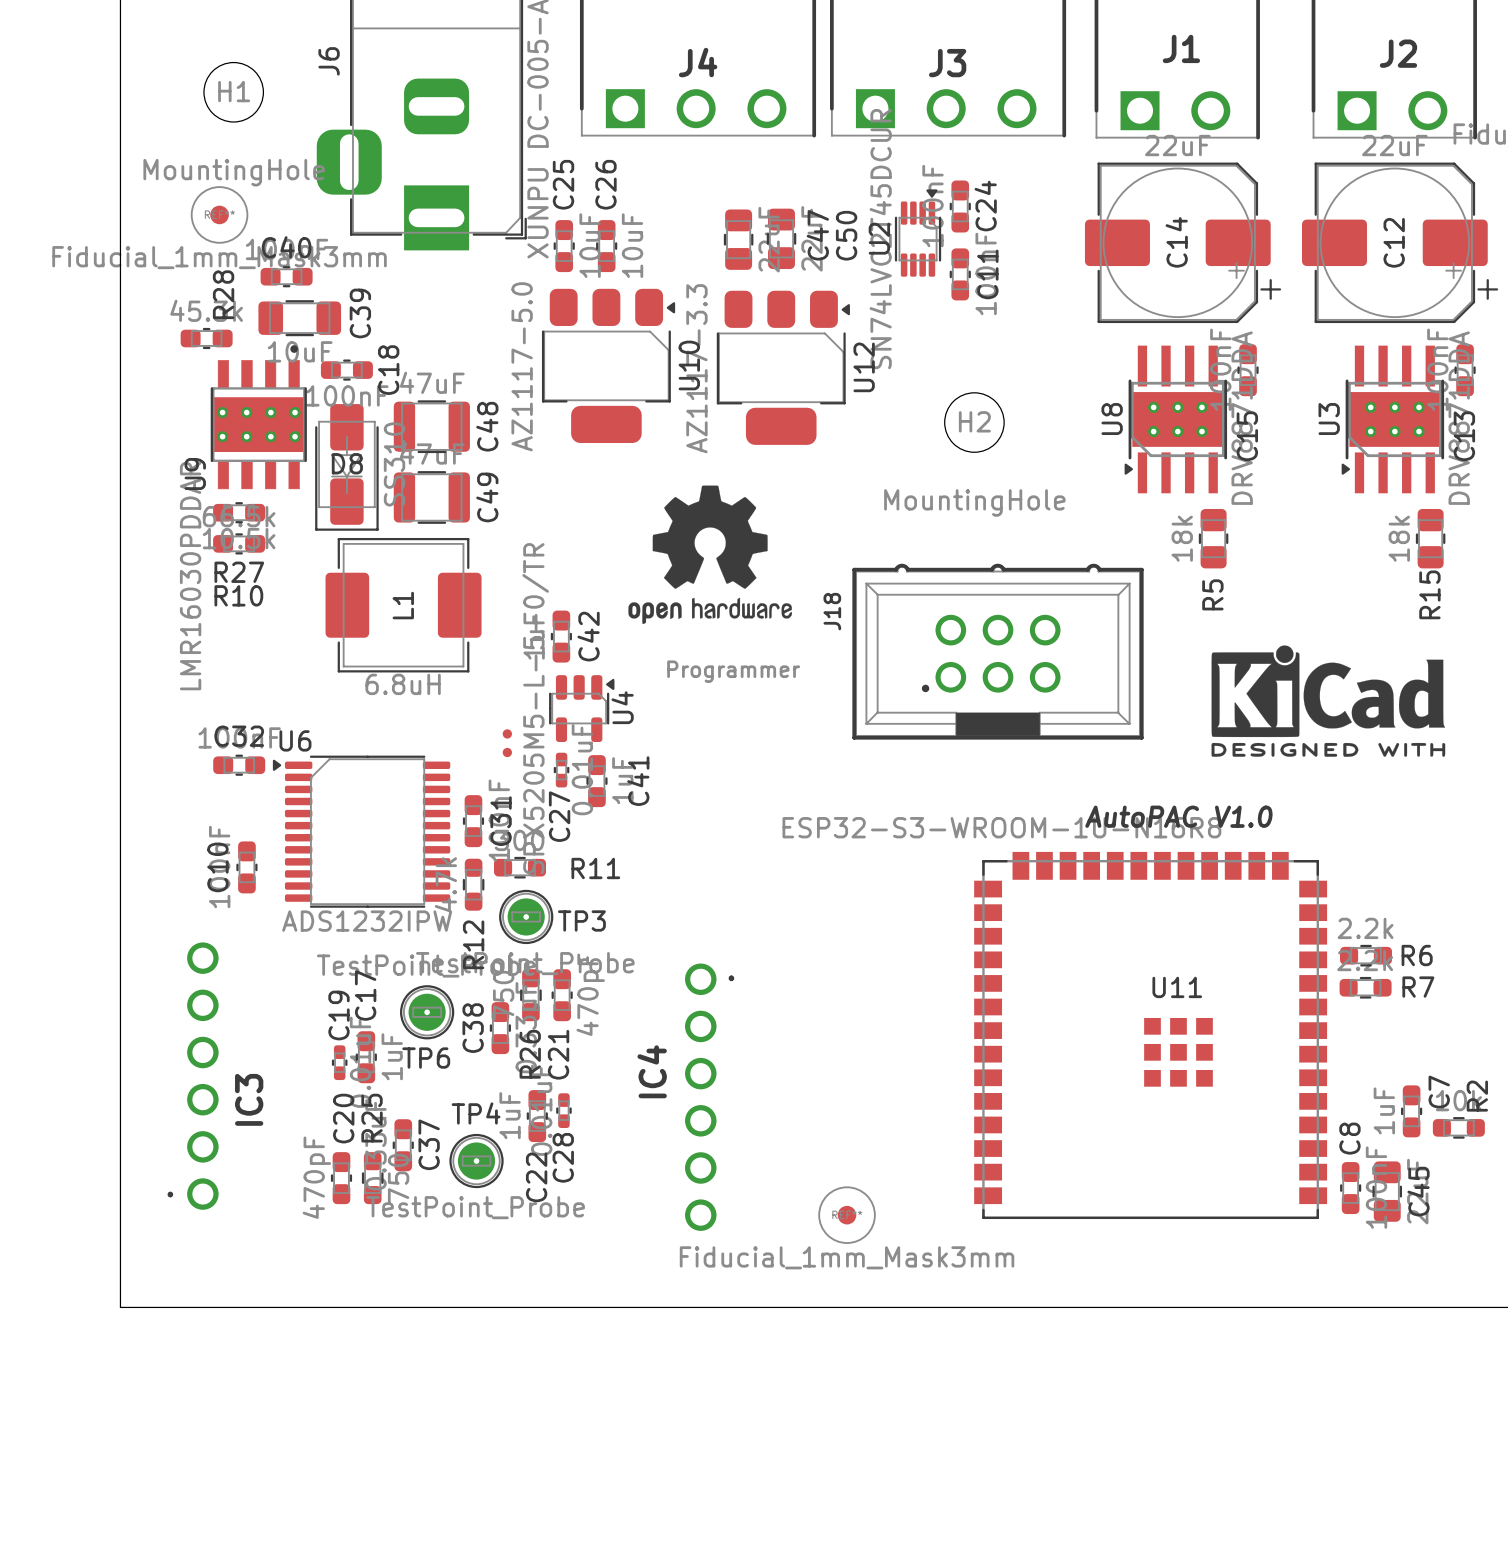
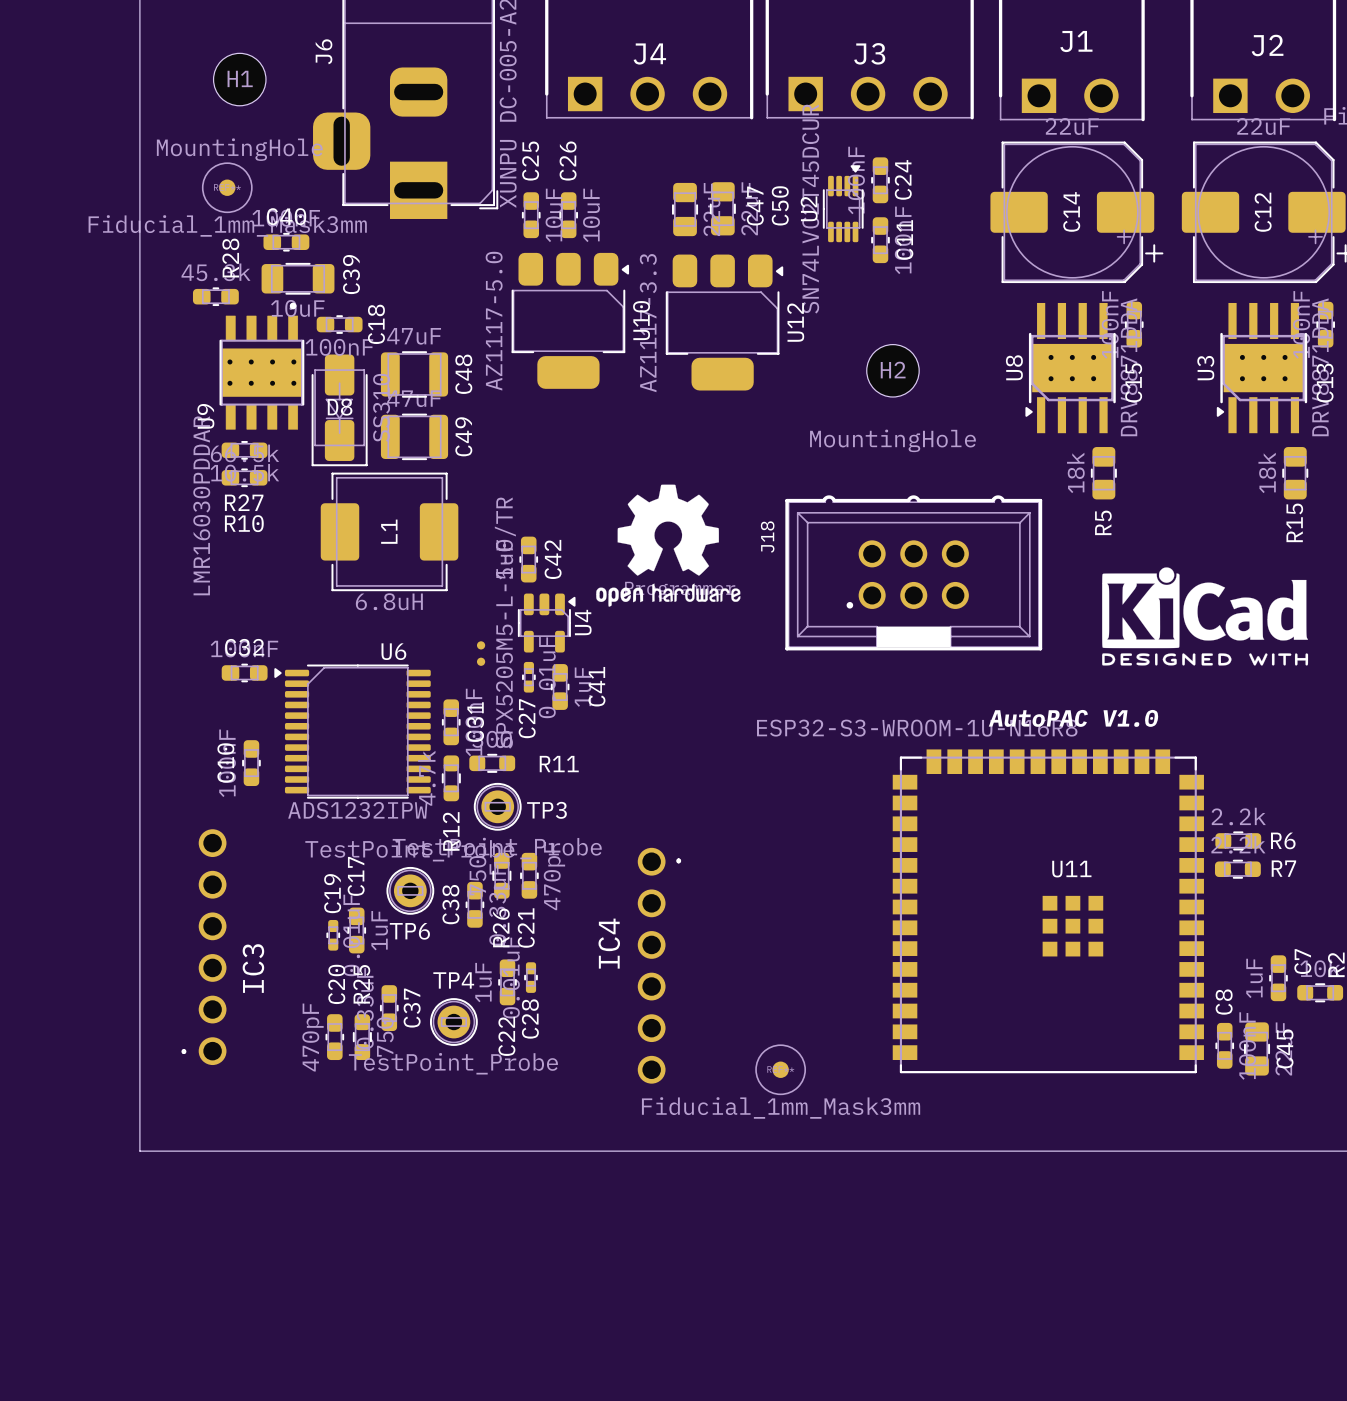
drawing position: (710, 554) -> (668, 545)
U6 name position: U6 (295, 740) -> U6 (393, 651)
TP3 footprint: [499, 889, 554, 945] -> [473, 782, 522, 831]
TP6 footprint: [400, 985, 455, 1040] -> [386, 866, 435, 915]
TP4 footprint: [449, 1133, 504, 1189] -> [429, 998, 478, 1046]

